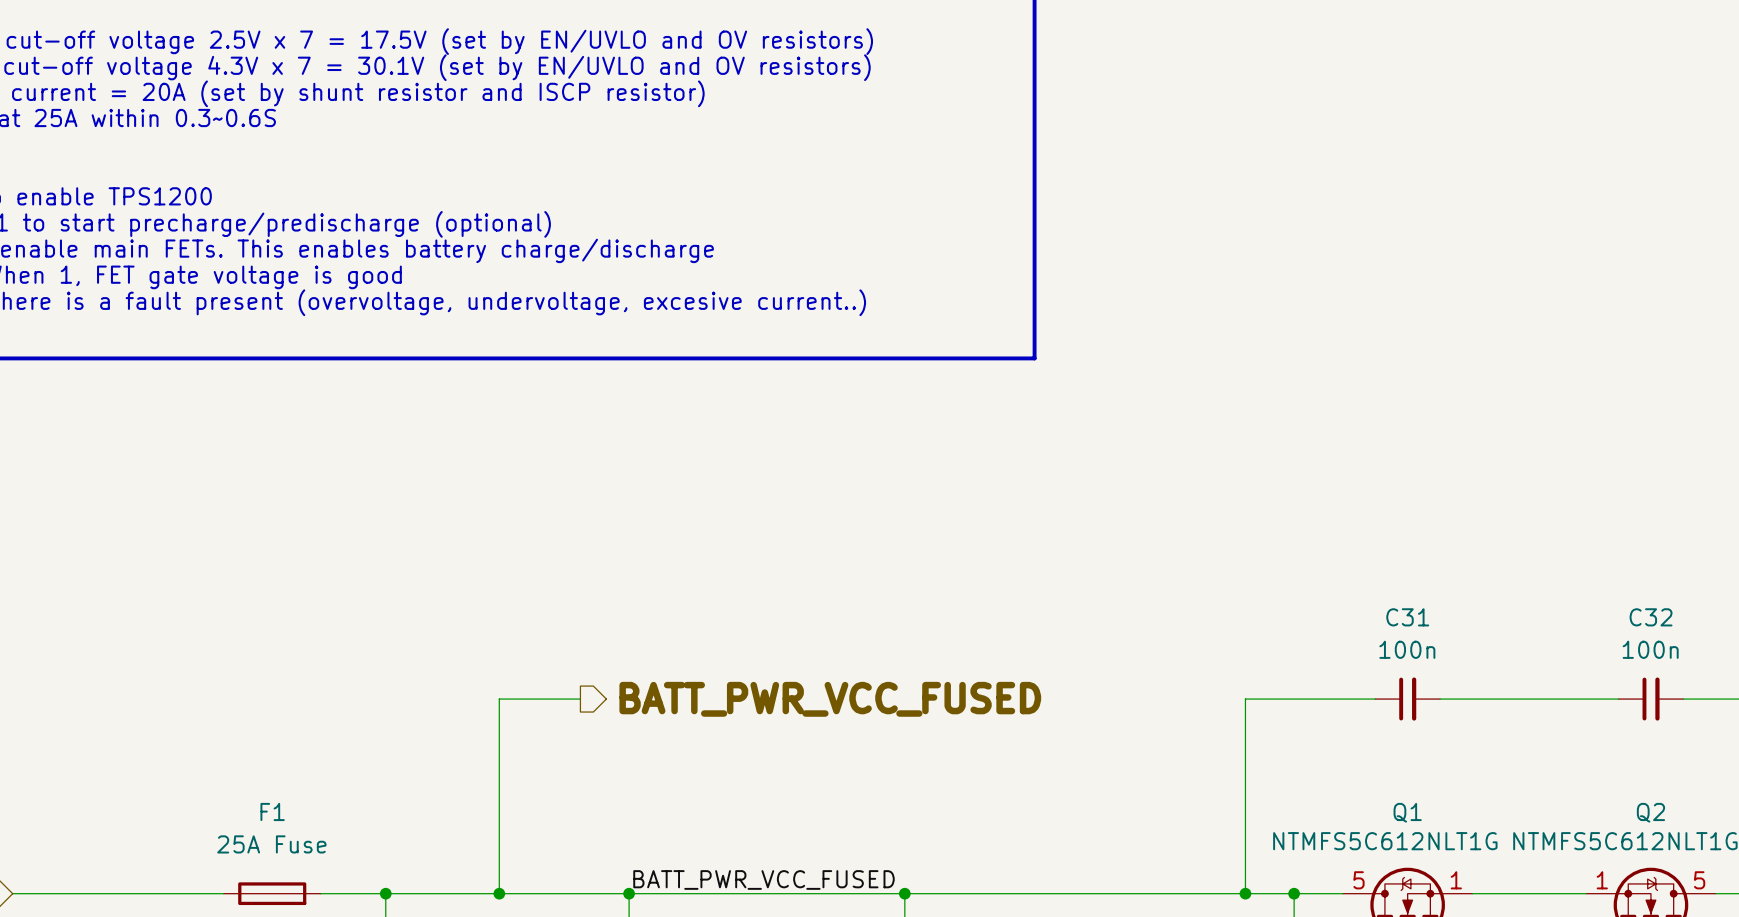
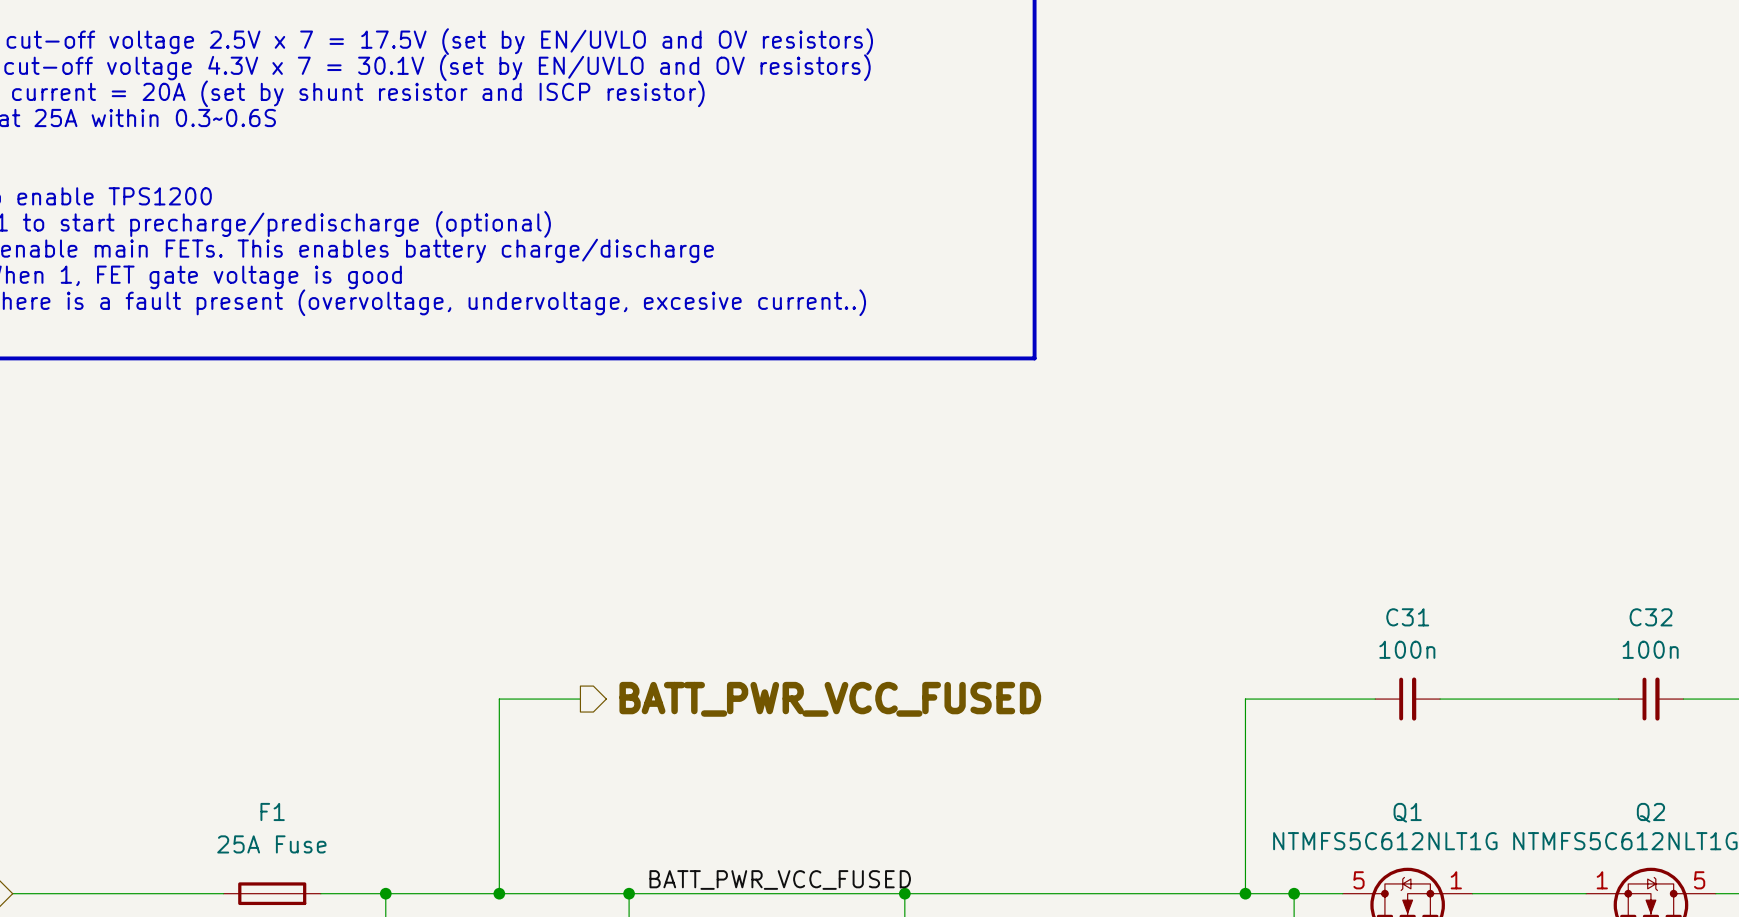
label position: BATT_PWR_VCC_FUSED (763, 879) -> BATT_PWR_VCC_FUSED (780, 879)

